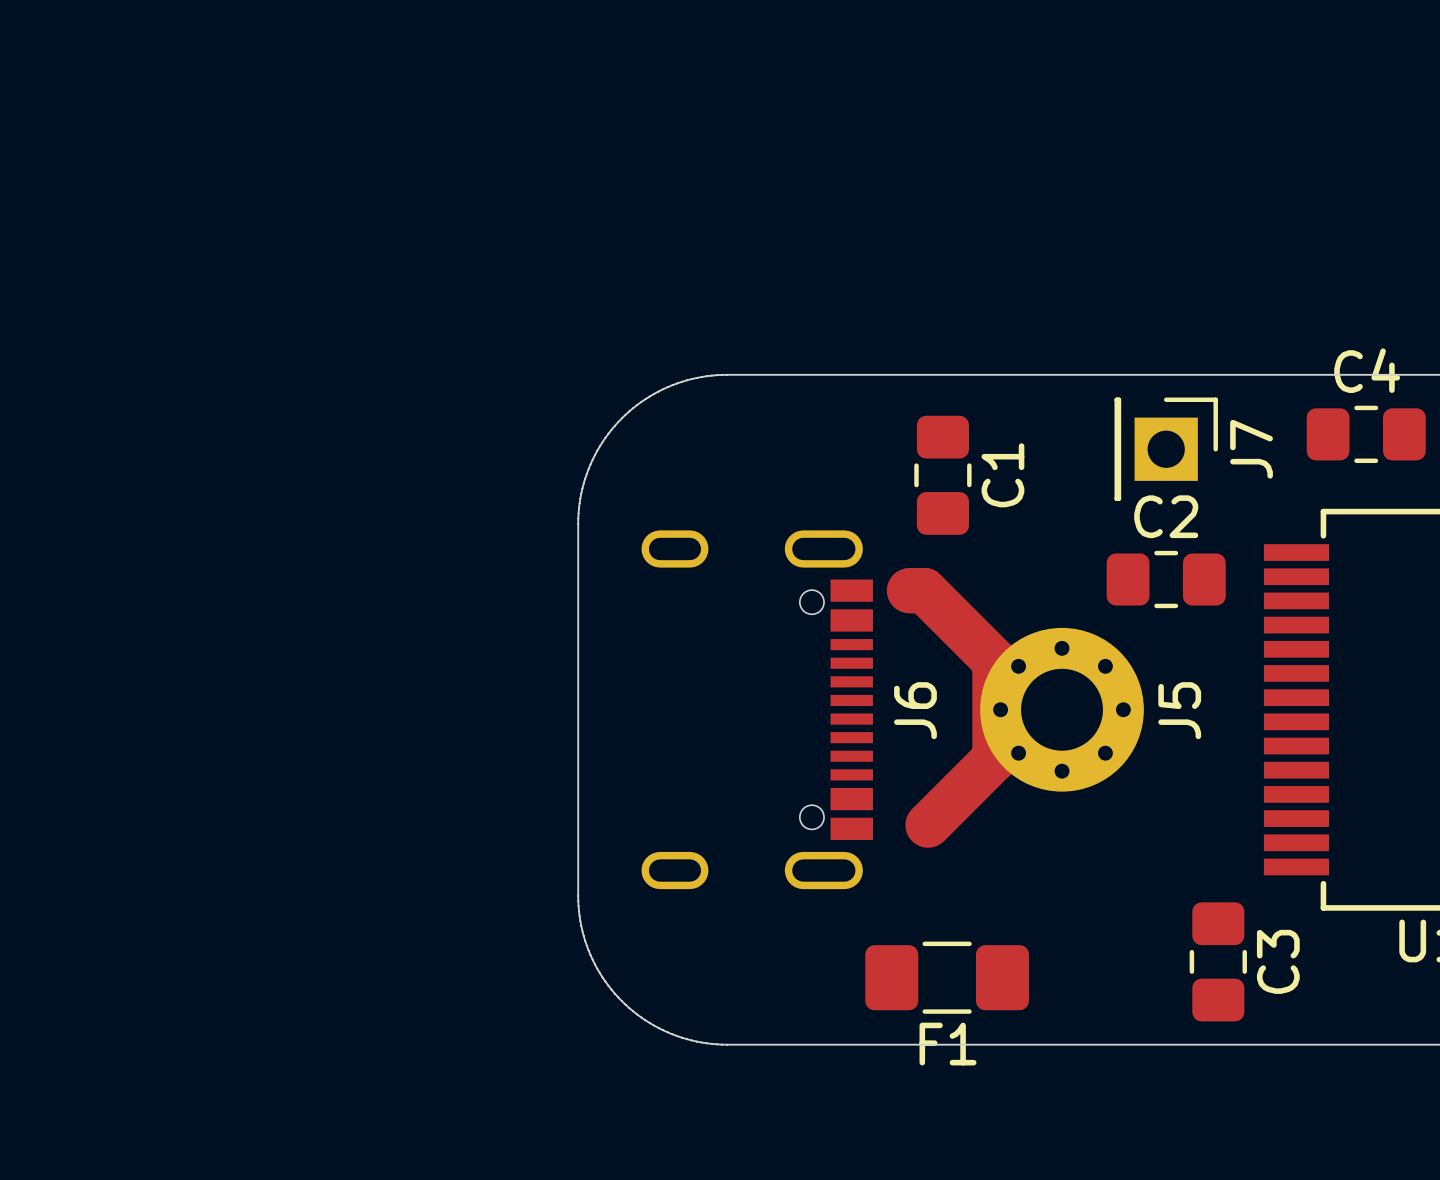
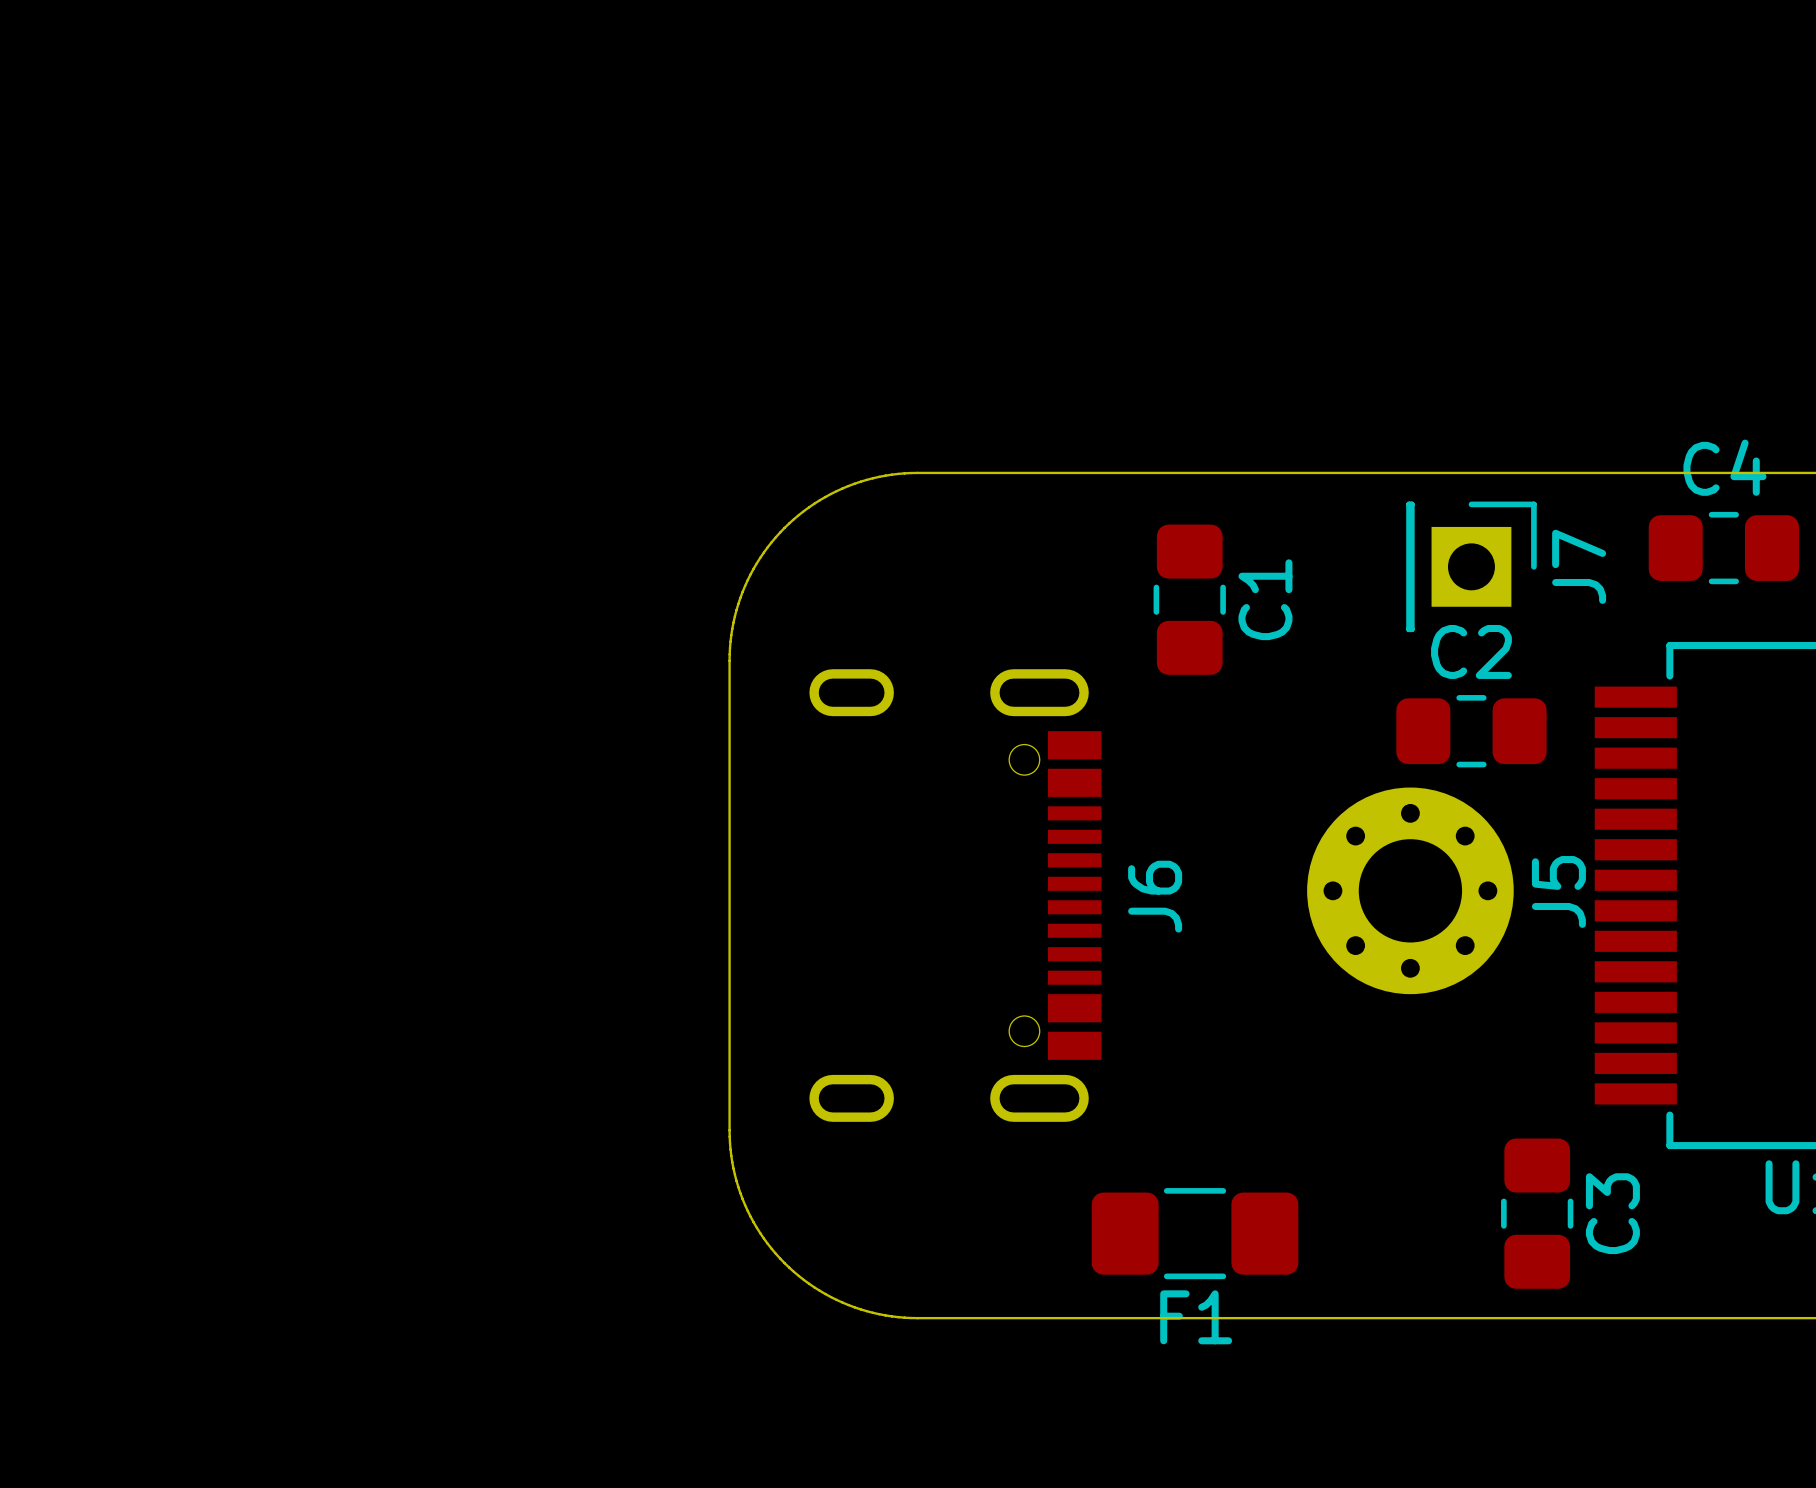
top track: (909, 590) (924, 590) (995, 661) (995, 758) (928, 825) -> none
J5 position: (1062, 709) -> (1410, 890)

